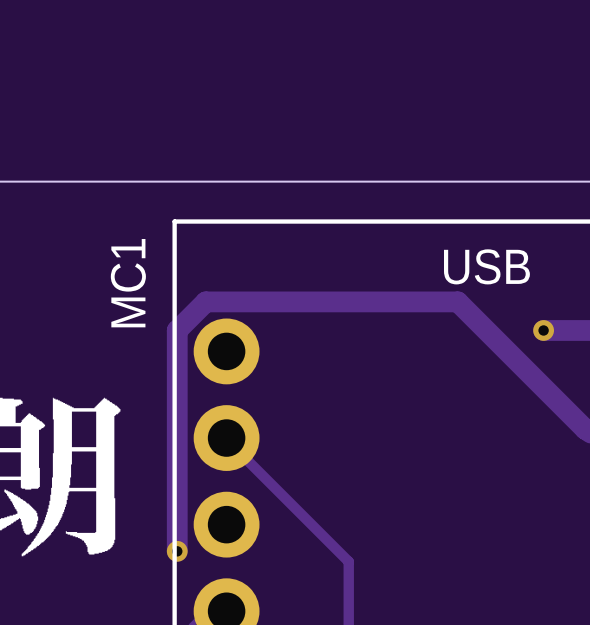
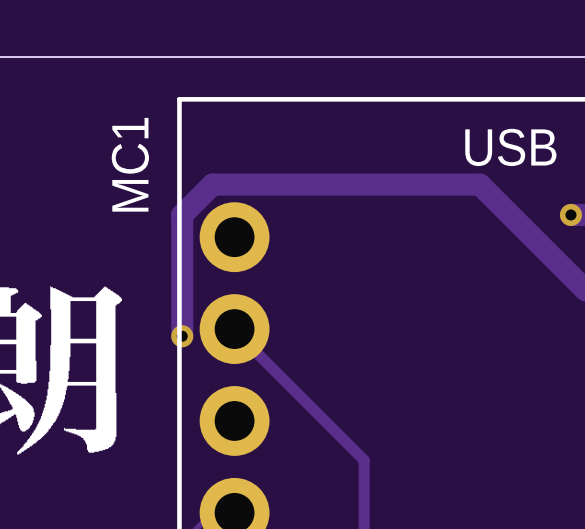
track: (177, 444) (177, 551) -> none
via position: (177, 551) -> (182, 336)

